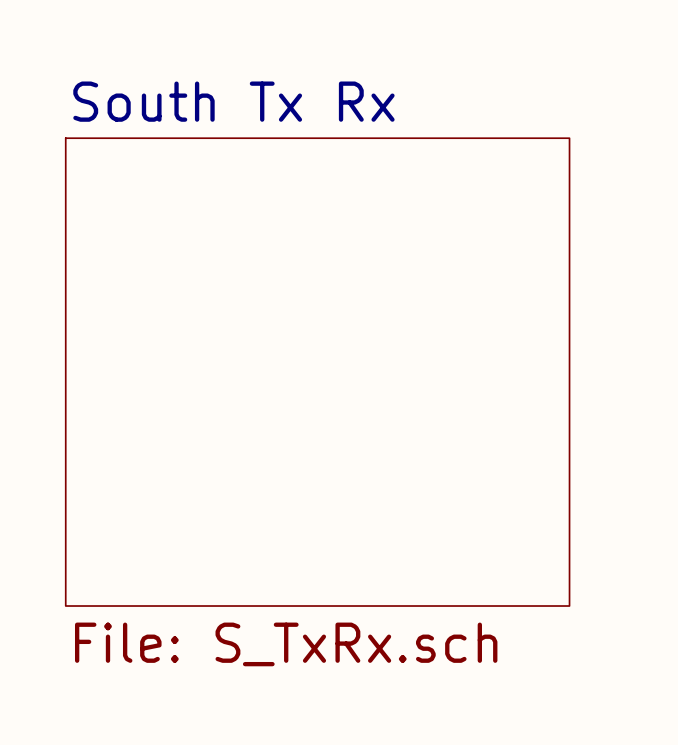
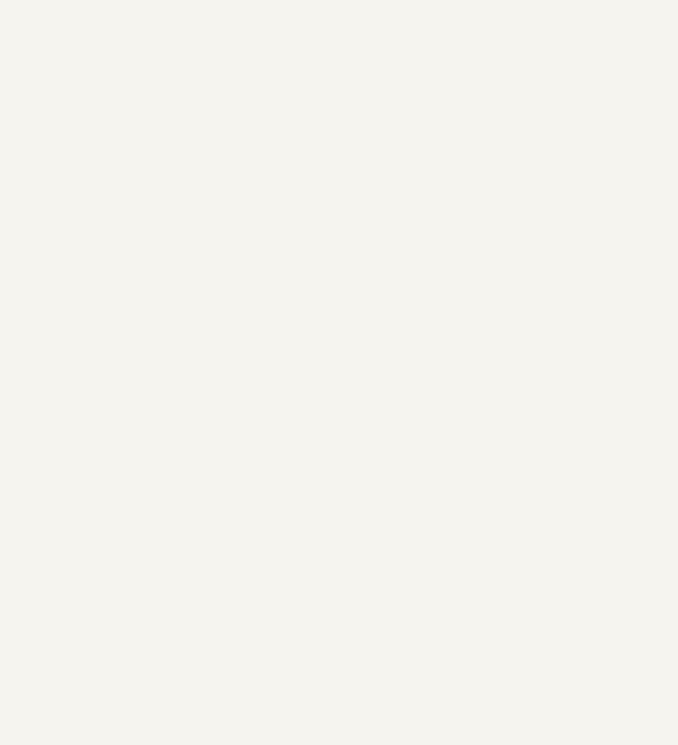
sheet South Tx Rx: File: S_TxRx.sch (317, 372) -> none

